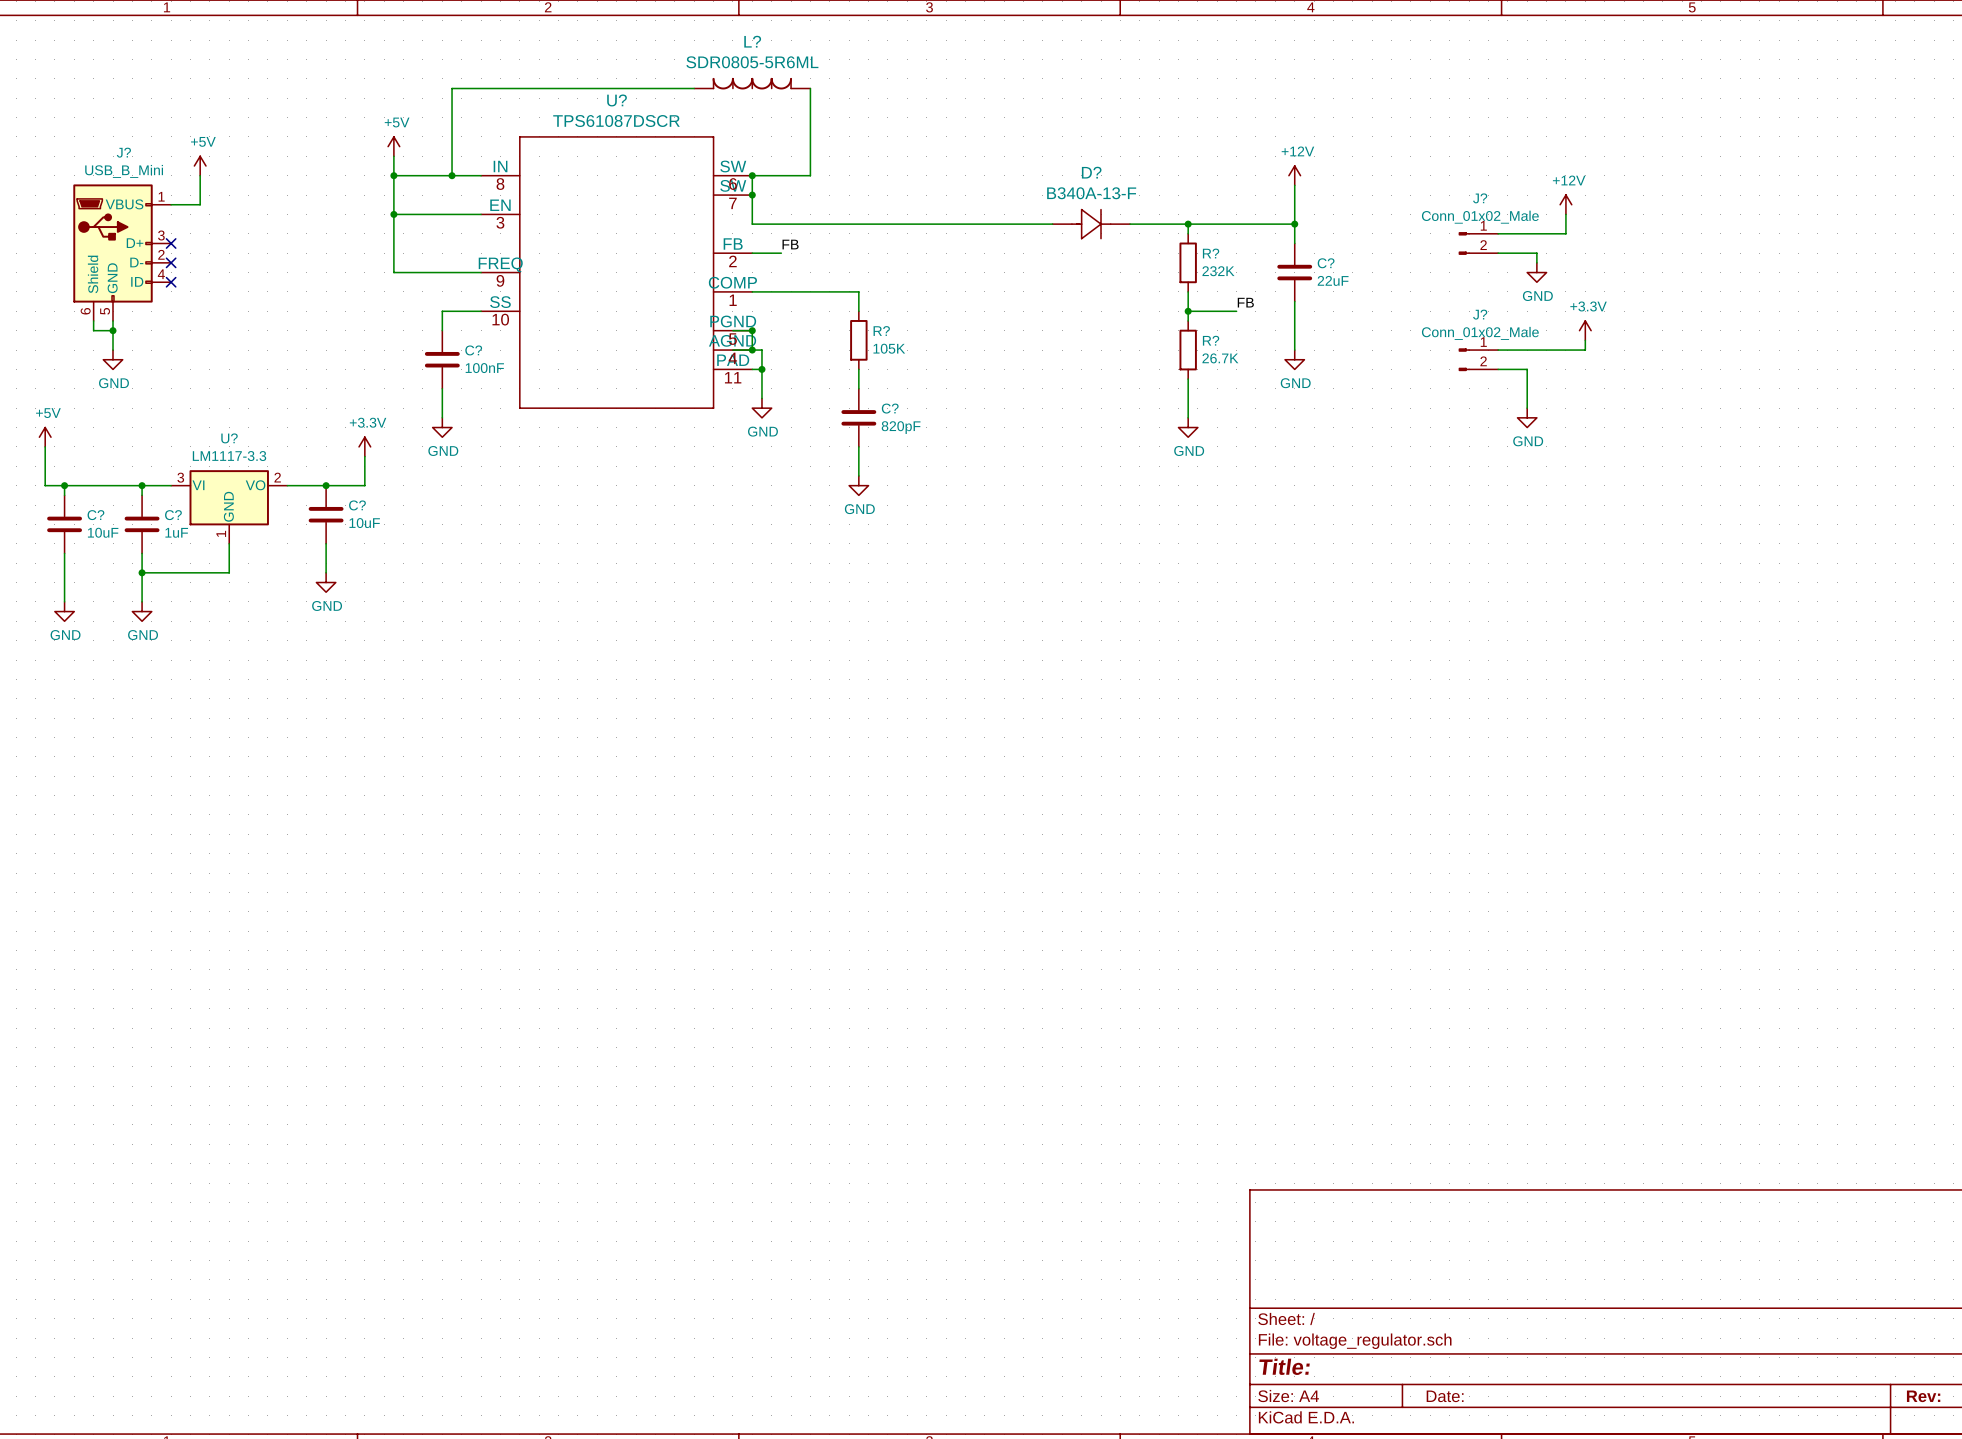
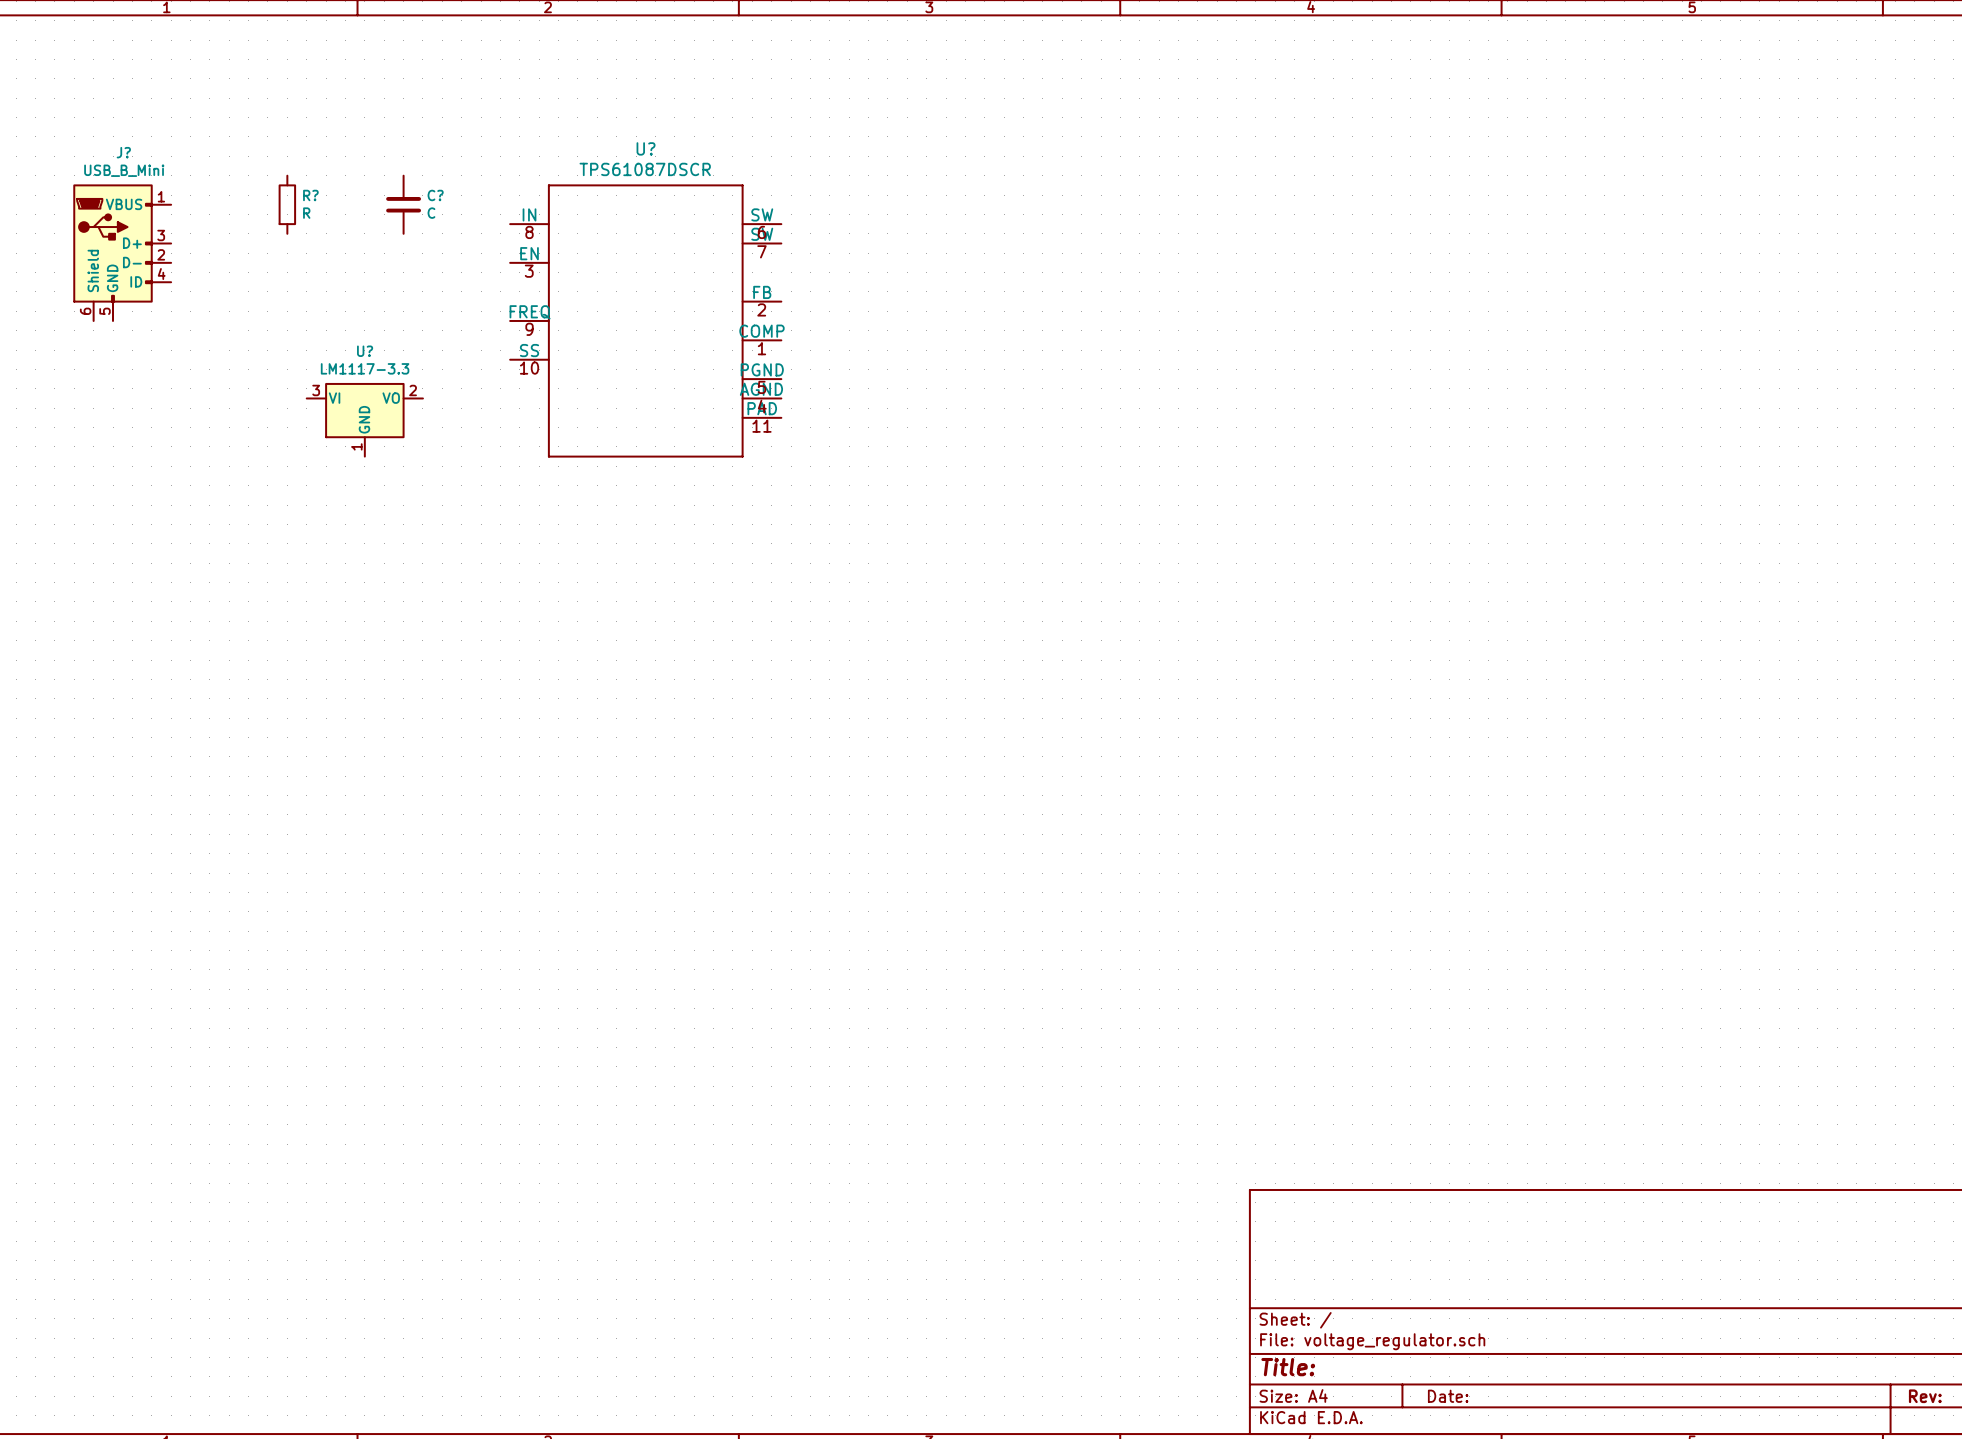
L?: SDR0805-5R6ML (752, 83) -> none
wire: (694, 88) (452, 88) (452, 175) -> none
wire: (810, 88) (810, 175) (752, 175) (752, 224) (1052, 224) -> none
power symbol: +5V (393, 146) -> none
wire: (393, 156) (393, 272) (481, 272) -> none
power symbol: +5V (200, 166) -> none
wire: (200, 175) (200, 204) (171, 204) -> none
wire: (393, 175) (481, 175) -> none
junction: (393, 175) -> none
junction: (452, 175) -> none
junction: (752, 175) -> none
power symbol: +12V (1294, 175) -> none
wire: (1294, 185) (1294, 243) -> none
junction: (752, 195) -> none
R?: none -> R (287, 204)
C?: none -> C (403, 204)
power symbol: +12V (1565, 204) -> none
wire: (393, 214) (481, 214) -> none
junction: (393, 214) -> none
wire: (1565, 214) (1565, 233) (1498, 233) -> none
D?: B340A-13-F (1091, 224) -> none
wire: (1130, 224) (1294, 224) -> none
wire: (1188, 224) (1188, 233) -> none
junction: (1188, 224) -> none
junction: (1294, 224) -> none
no-connect mark: (171, 243) -> none
J?: Conn_01x02_Male (1478, 243) -> none
label: FB (790, 244) -> none
wire: (752, 253) (781, 253) -> none
wire: (1498, 253) (1536, 253) (1536, 262) -> none
no-connect mark: (171, 262) -> none
R?: 232K (1188, 262) -> none
U? position: (616, 272) -> (645, 320)
C?: 22uF (1294, 272) -> none
power symbol: GND (1536, 272) -> none
no-connect mark: (171, 282) -> none
wire: (752, 291) (858, 291) (858, 311) -> none
wire: (1188, 291) (1188, 320) -> none
wire: (1294, 301) (1294, 350) -> none
label: FB (1245, 302) -> none
wire: (481, 311) (442, 311) (442, 330) -> none
wire: (1188, 311) (1236, 311) -> none
junction: (1188, 311) -> none
wire: (93, 320) (93, 330) (113, 330) -> none
wire: (113, 320) (113, 350) -> none
junction: (113, 330) -> none
wire: (732, 330) (752, 330) (752, 350) -> none
junction: (752, 330) -> none
power symbol: +3.3V (1585, 330) -> none
R?: 105K (858, 340) -> none
wire: (1585, 340) (1585, 350) (1498, 350) -> none
wire: (732, 350) (761, 350) (761, 398) -> none
junction: (752, 350) -> none
R?: 26.7K (1188, 350) -> none
power symbol: GND (113, 359) -> none
C?: 100nF (442, 359) -> none
power symbol: GND (1294, 359) -> none
J?: Conn_01x02_Male (1478, 359) -> none
wire: (752, 369) (761, 369) -> none
junction: (761, 369) -> none
wire: (858, 369) (858, 388) -> none
wire: (1498, 369) (1527, 369) (1527, 408) -> none
wire: (1188, 379) (1188, 417) -> none
wire: (442, 388) (442, 417) -> none
power symbol: GND (761, 408) -> none
C?: 820pF (858, 417) -> none
power symbol: GND (1527, 417) -> none
power symbol: GND (442, 427) -> none
power symbol: GND (1188, 427) -> none
power symbol: +5V (45, 437) -> none
wire: (45, 446) (45, 485) (171, 485) -> none
power symbol: +3.3V (364, 446) -> none
wire: (858, 446) (858, 475) -> none
wire: (364, 456) (364, 485) (287, 485) -> none
wire: (64, 485) (64, 495) -> none
junction: (64, 485) -> none
wire: (142, 485) (142, 495) -> none
junction: (142, 485) -> none
junction: (326, 485) -> none
power symbol: GND (858, 485) -> none
U? position: (229, 506) -> (364, 419)
C?: 10uF (326, 514) -> none
C?: 10uF (64, 524) -> none
C?: 1uF (142, 524) -> none
wire: (229, 543) (229, 572) (142, 572) -> none
wire: (326, 543) (326, 572) -> none
wire: (64, 553) (64, 601) -> none
wire: (142, 553) (142, 601) -> none
junction: (142, 572) -> none
power symbol: GND (326, 582) -> none
power symbol: GND (64, 611) -> none
power symbol: GND (142, 611) -> none

